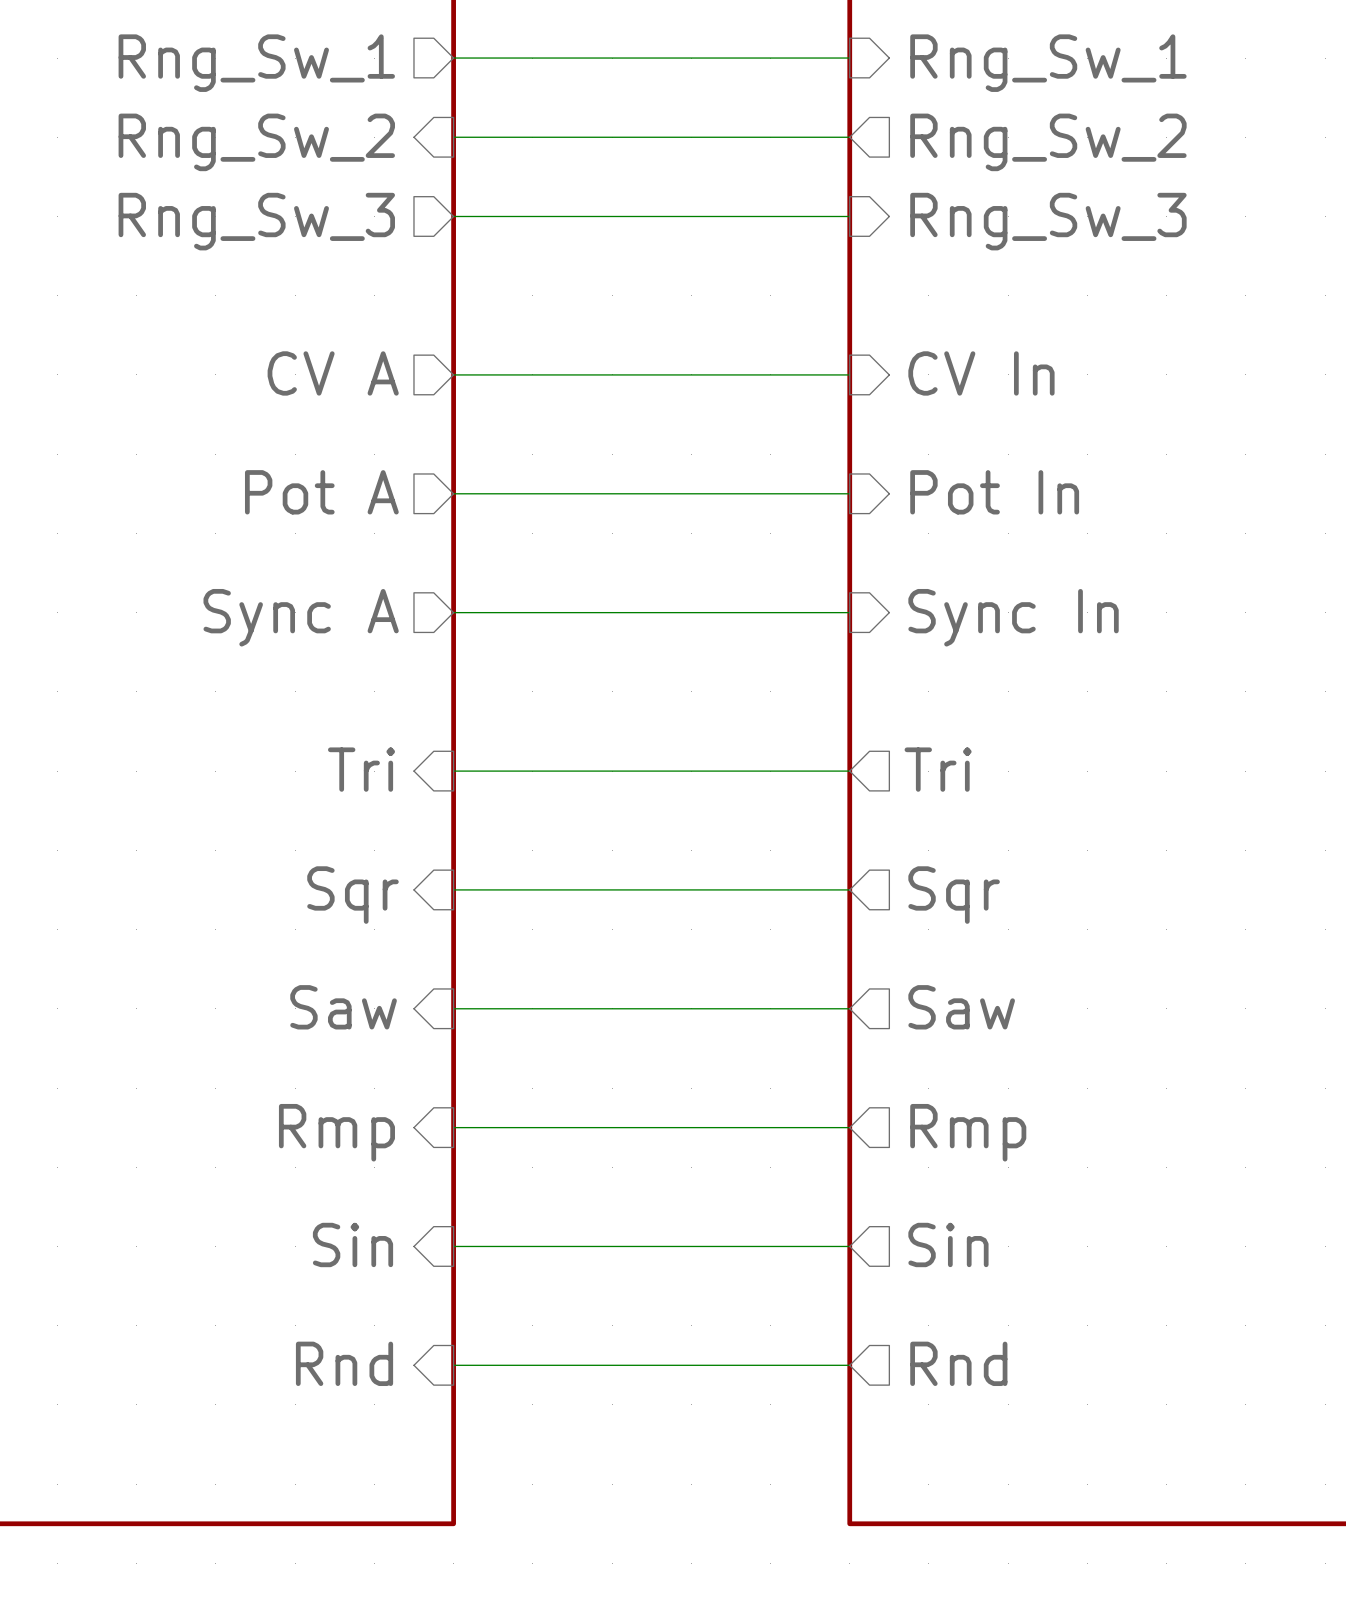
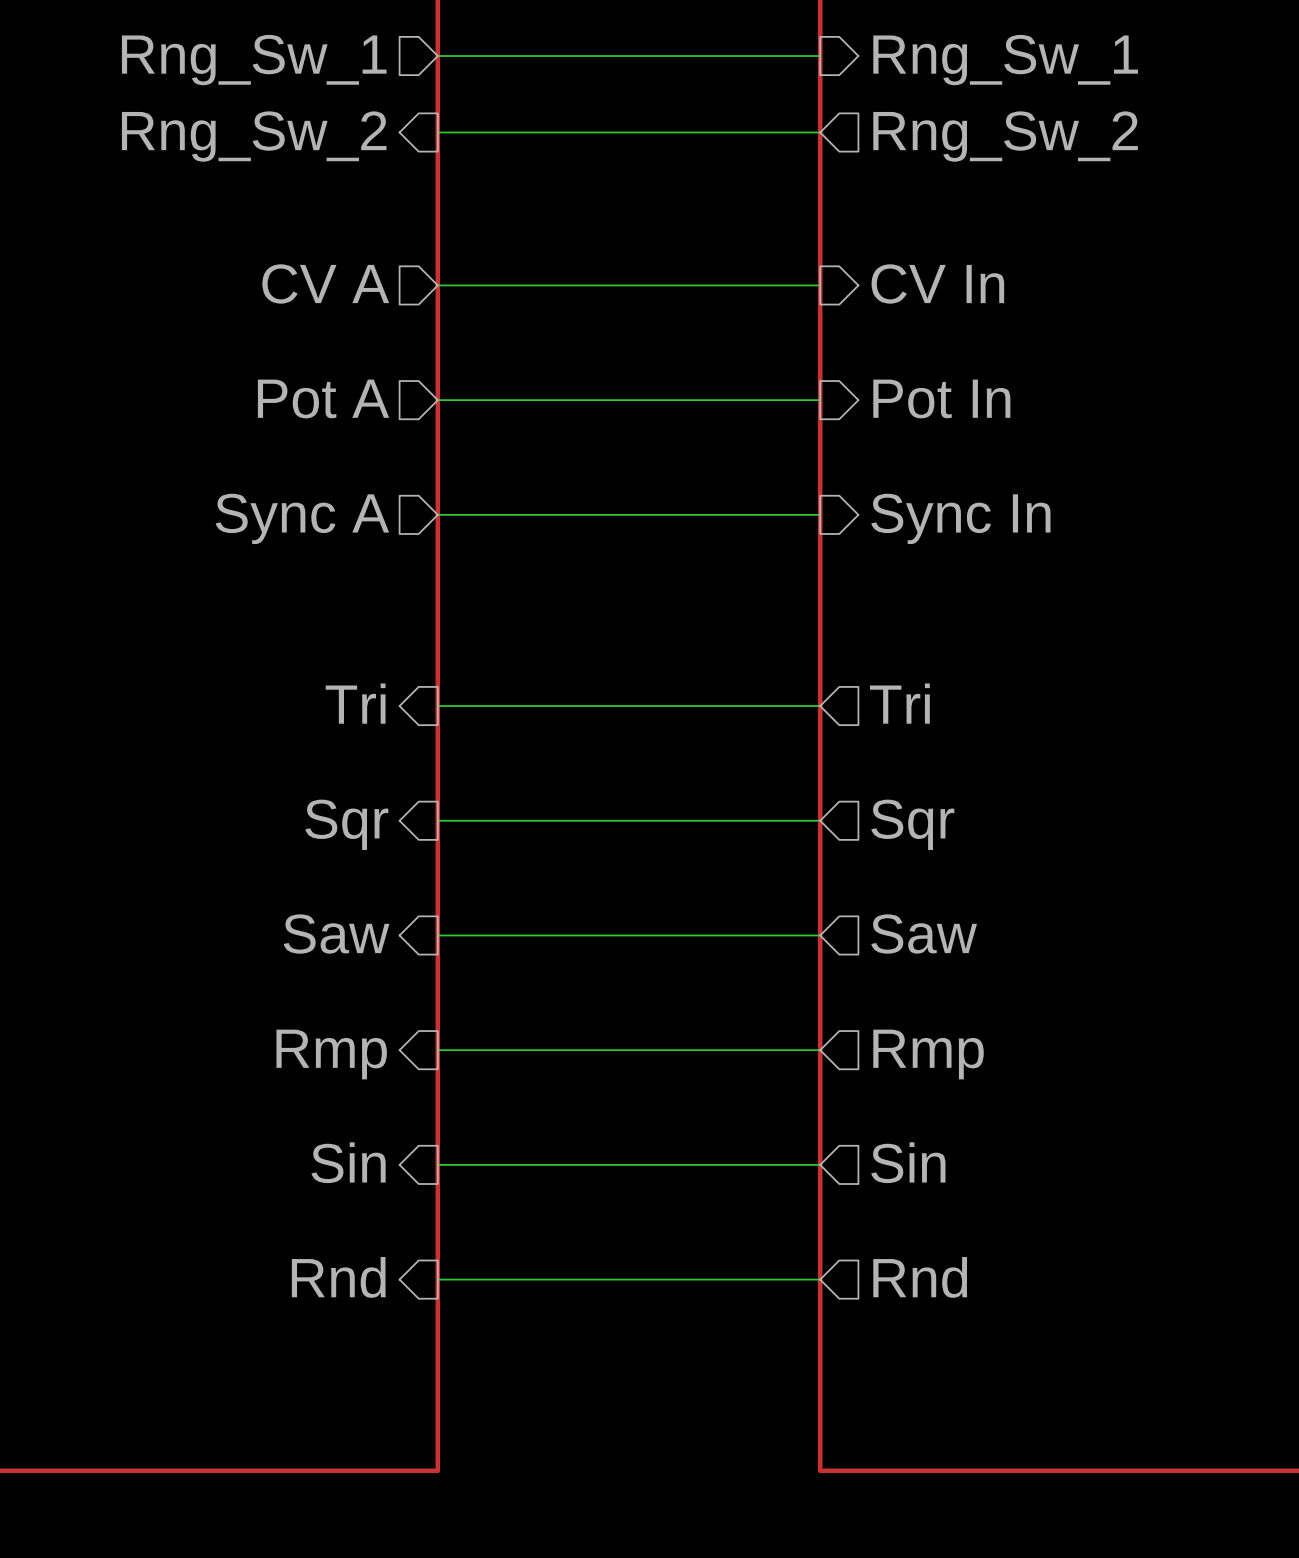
wire: (453, 216) (849, 216) -> (437, 285) (820, 285)
sheet pin: Rng_Sw_3 (256, 221) -> none
sheet pin: Rng_Sw_3 (1048, 221) -> none
sheet pin position: CV A (333, 373) -> CV A (325, 283)
sheet pin position: CV In (981, 373) -> CV In (937, 283)
wire: (453, 374) (849, 374) -> none
sheet pin position: Pot A (321, 492) -> Pot A (323, 398)
sheet pin position: Pot In (994, 492) -> Pot In (941, 398)
wire: (453, 493) (849, 493) -> (437, 400) (820, 400)
wire: (453, 612) (849, 612) -> (437, 514) (820, 514)
sheet pin position: Sync A (301, 617) -> Sync A (302, 518)
sheet pin position: Sync In (1013, 617) -> Sync In (960, 518)
sheet pin position: Tri (361, 769) -> Tri (355, 703)
sheet pin position: Tri (938, 769) -> Tri (899, 703)
wire: (453, 771) (849, 771) -> (437, 706) (820, 706)
wire: (453, 889) (849, 889) -> (437, 820) (820, 820)
sheet pin position: Sqr (353, 895) -> Sqr (346, 824)
sheet pin position: Sqr (954, 895) -> Sqr (912, 824)
sheet pin position: Saw (343, 1007) -> Saw (336, 934)
sheet pin position: Saw (961, 1007) -> Saw (924, 934)
wire: (453, 1008) (849, 1008) -> (437, 935) (820, 935)
wire: (453, 1127) (849, 1127) -> (437, 1050) (820, 1050)
sheet pin position: Rmp (336, 1132) -> Rmp (331, 1054)
sheet pin position: Rmp (968, 1132) -> Rmp (928, 1054)
sheet pin position: Sin (353, 1244) -> Sin (348, 1162)
sheet pin position: Sin (948, 1244) -> Sin (908, 1162)
wire: (453, 1246) (849, 1246) -> (437, 1164) (820, 1164)
sheet pin position: Rnd (344, 1363) -> Rnd (338, 1277)
sheet pin position: Rnd (958, 1363) -> Rnd (920, 1277)
wire: (453, 1365) (849, 1365) -> (437, 1279) (820, 1279)

